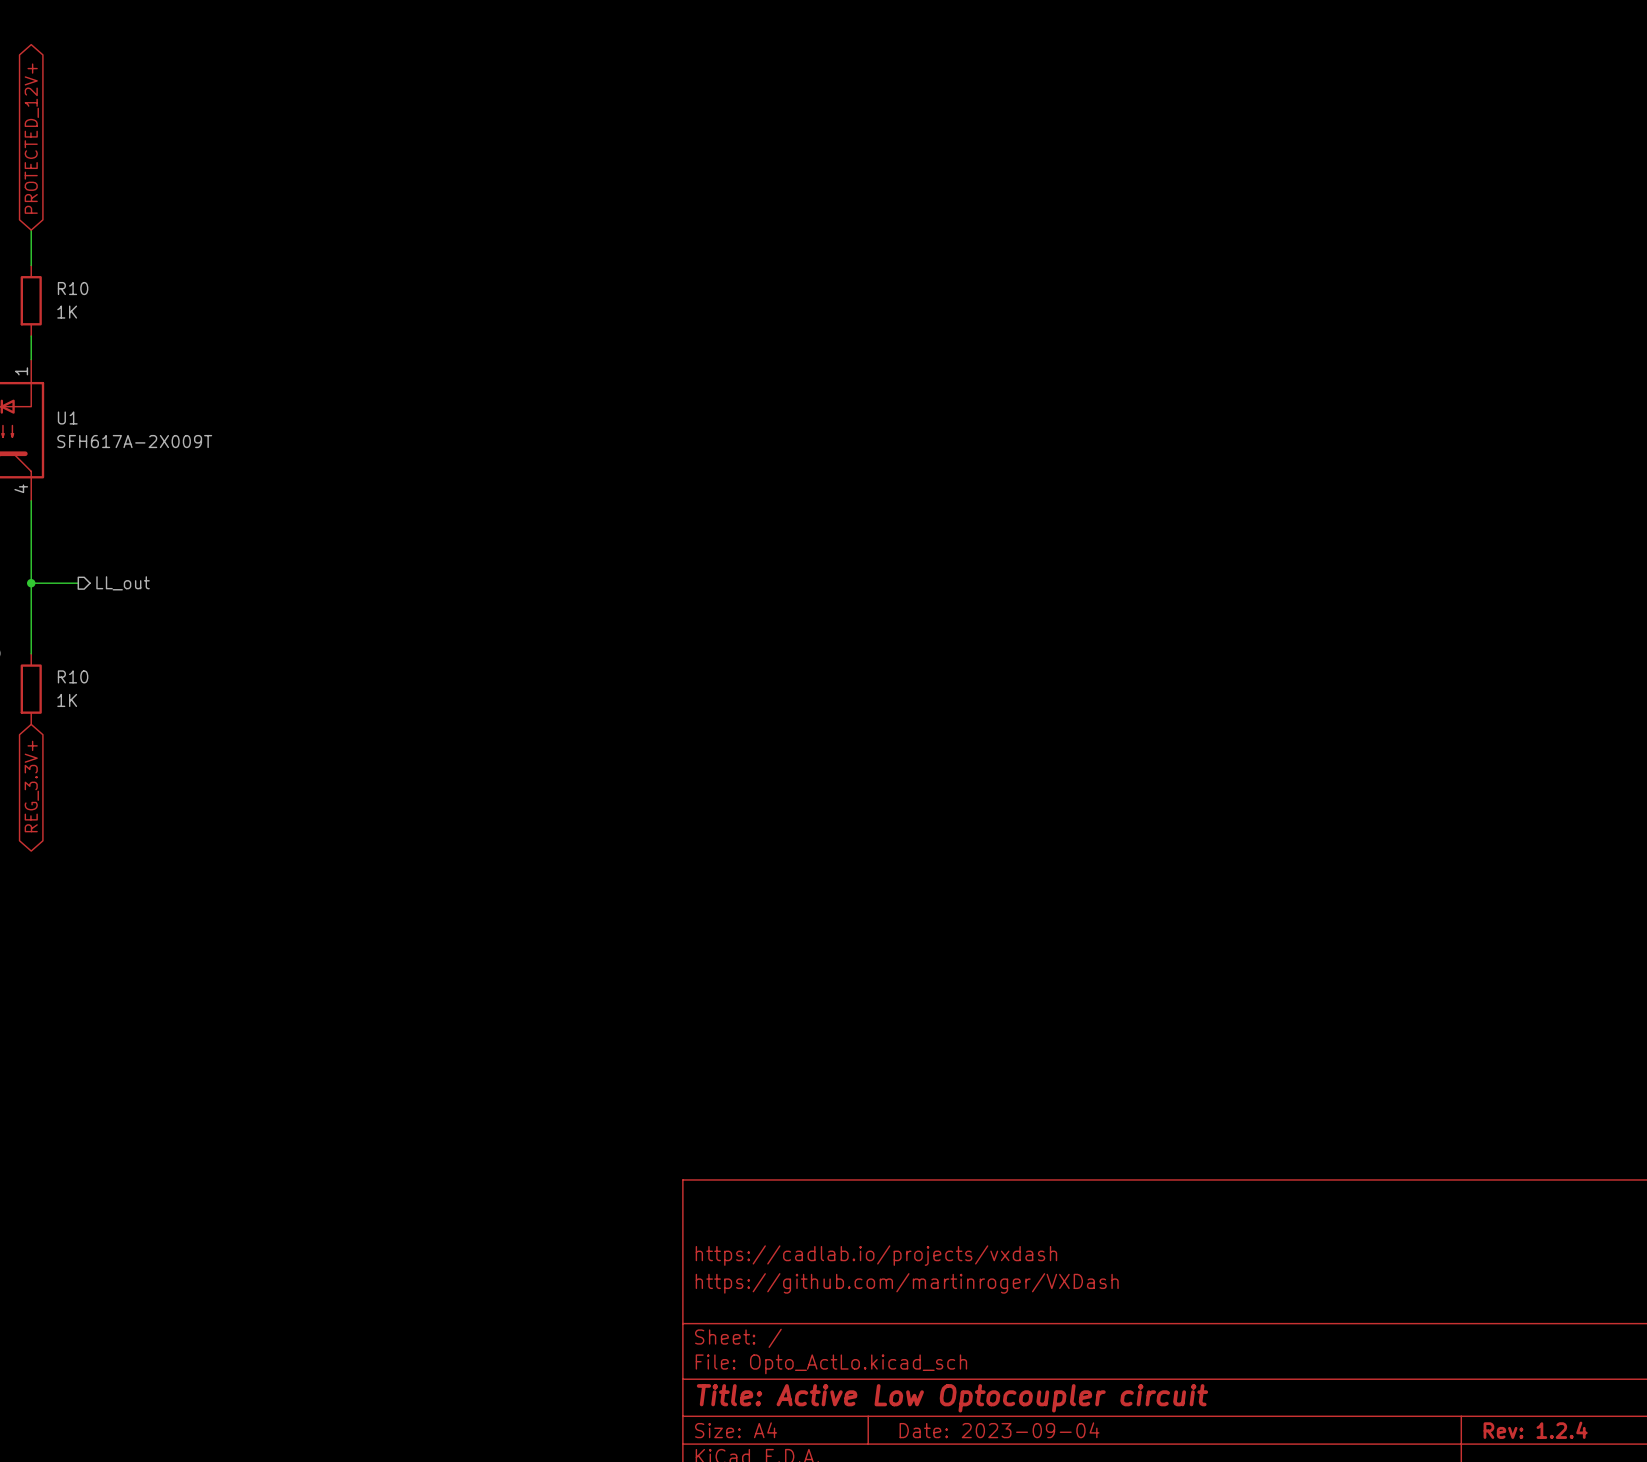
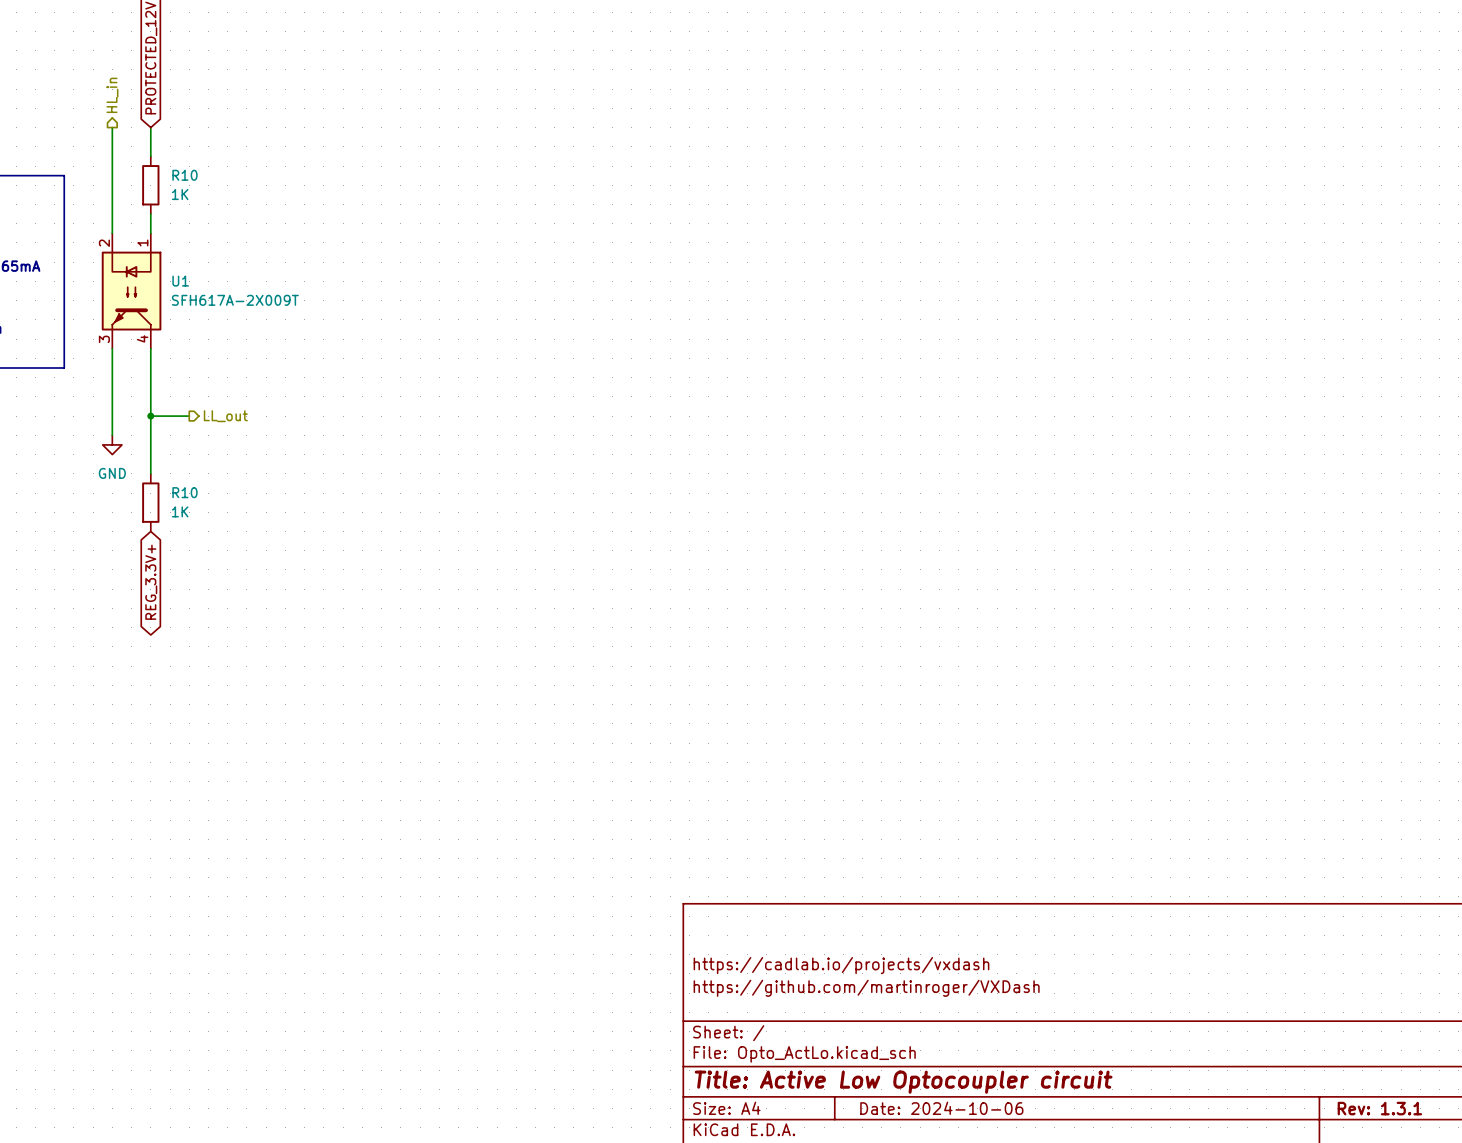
title block: Date: 2023-09-04 (999, 1430) -> Date: 2024-10-06 (941, 1108)
title block: Rev: 1.2.4 (1535, 1430) -> Rev: 1.3.1 (1379, 1108)

